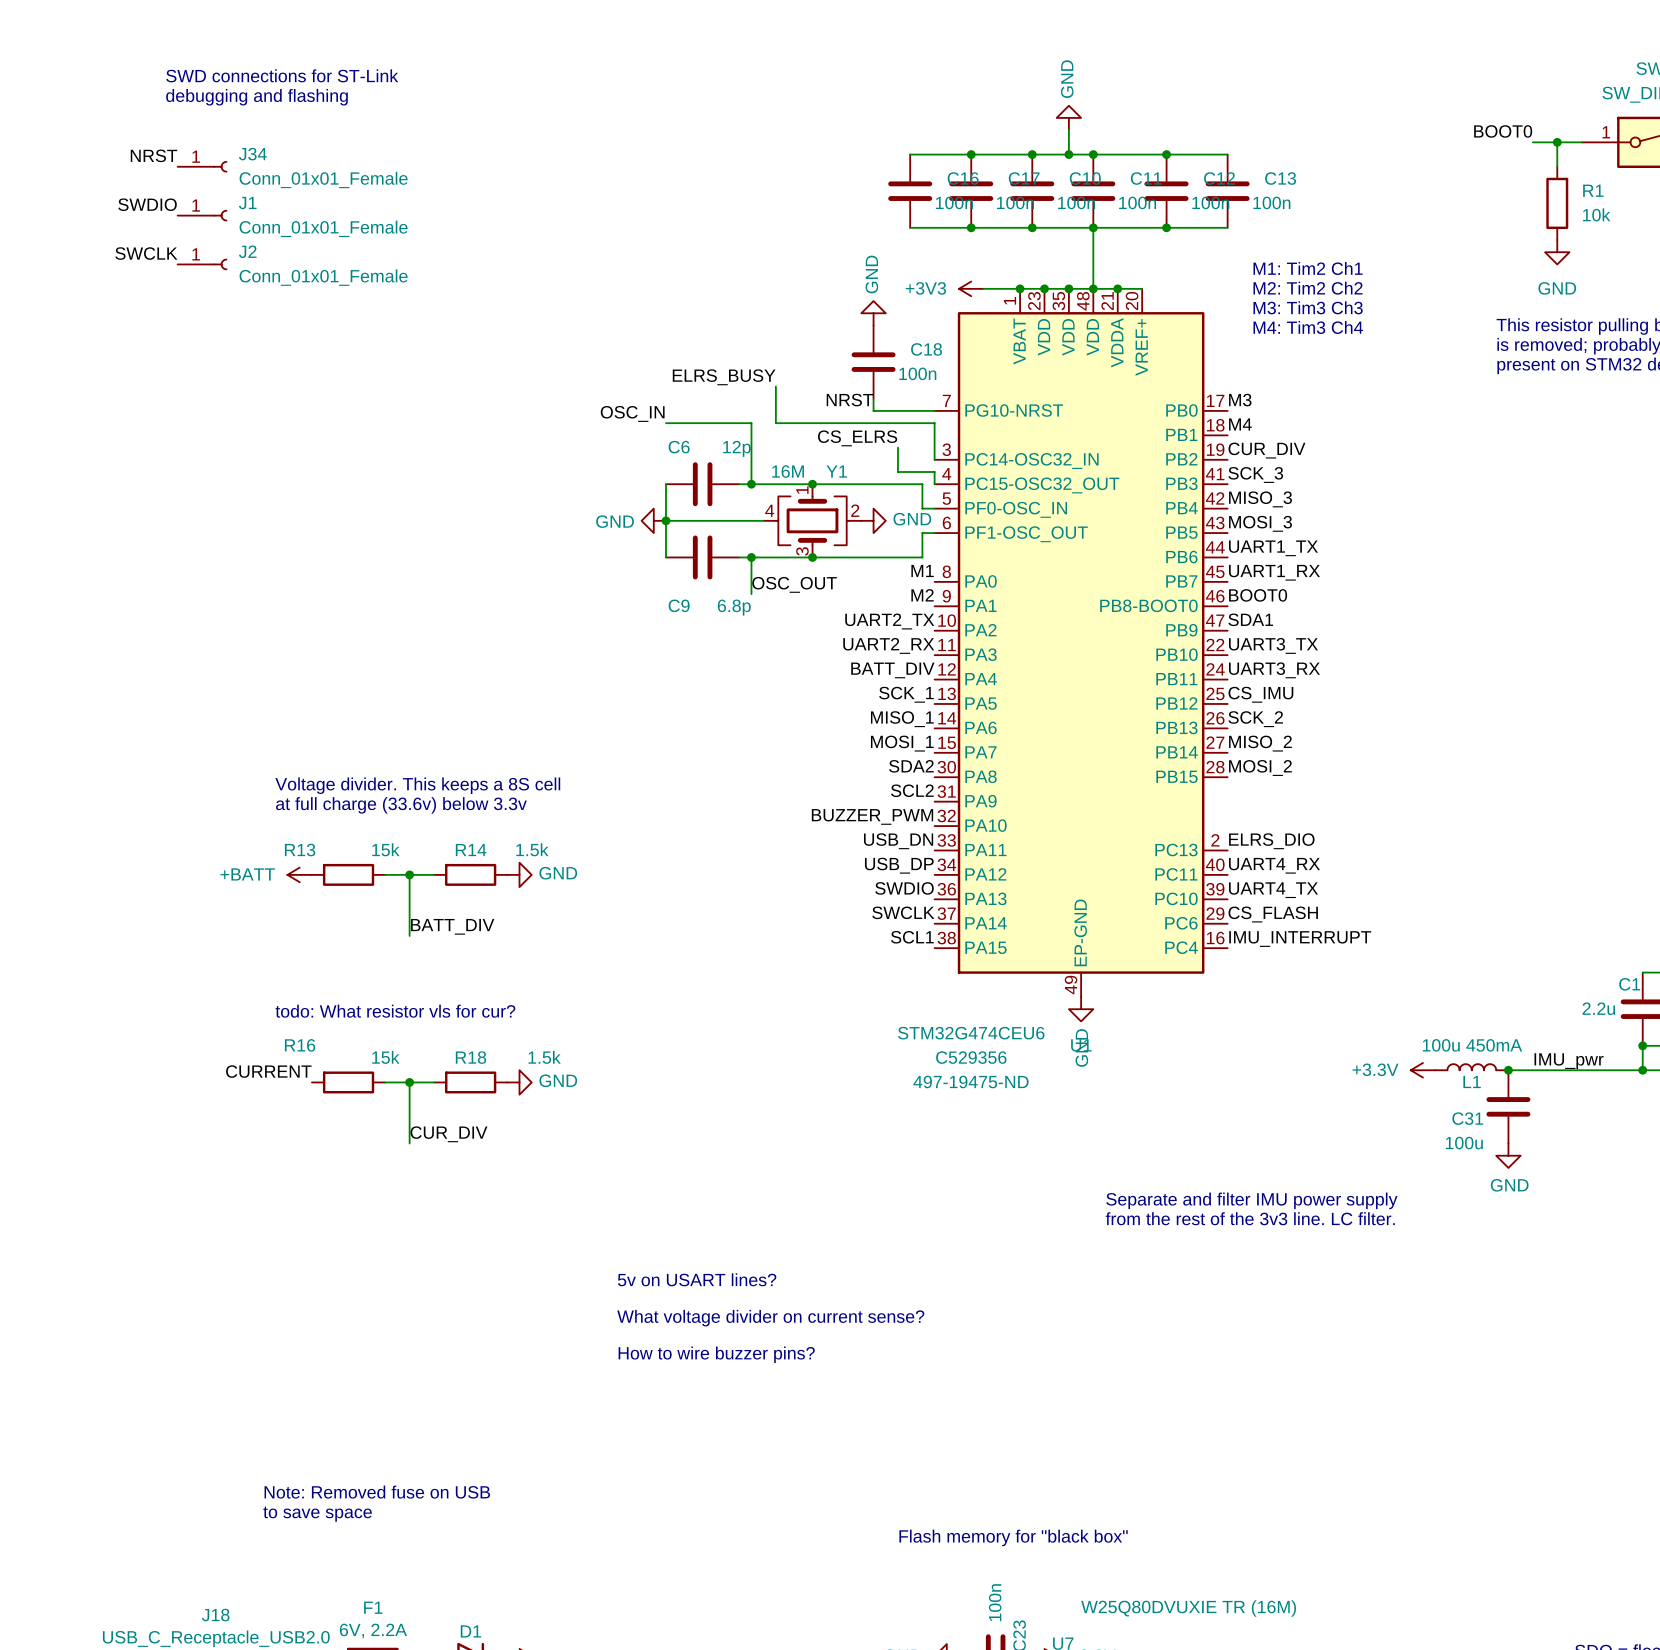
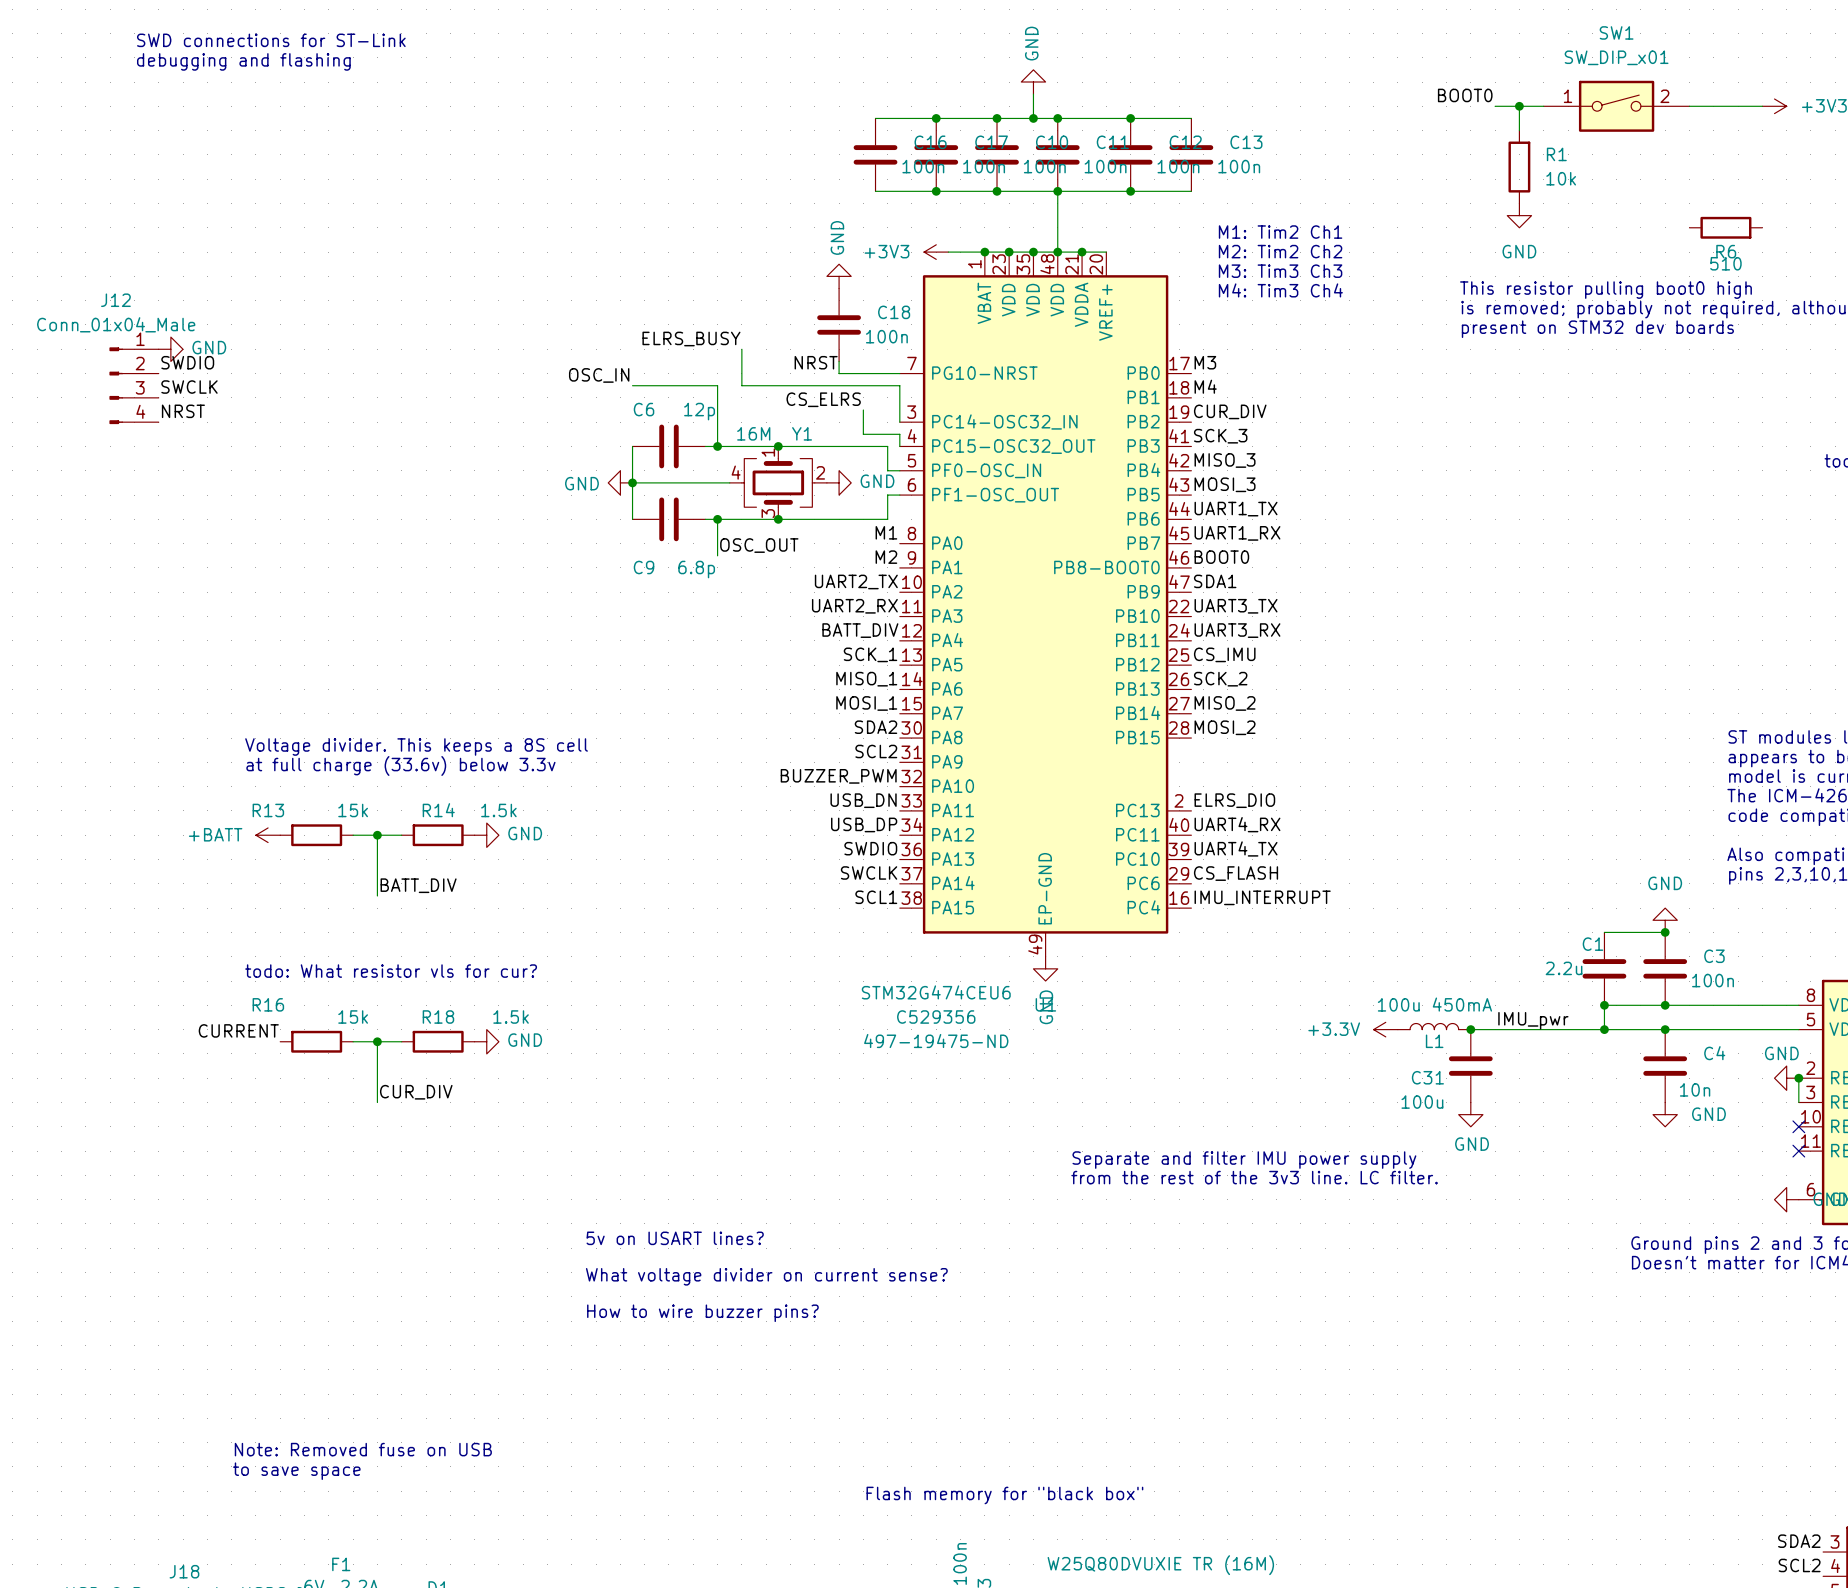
label: NRST (154, 155) -> none
J34: Conn_01x01_Female (202, 166) -> none
label position: SWDIO (147, 204) -> SWDIO (187, 362)
J1: Conn_01x01_Female (202, 215) -> none
label position: SWCLK (146, 253) -> SWCLK (189, 387)
J2: Conn_01x01_Female (202, 264) -> none
power symbol: none -> GND (170, 349)
J12: none -> Conn_01x04_Male (134, 385)
label: none -> NRST (183, 411)

